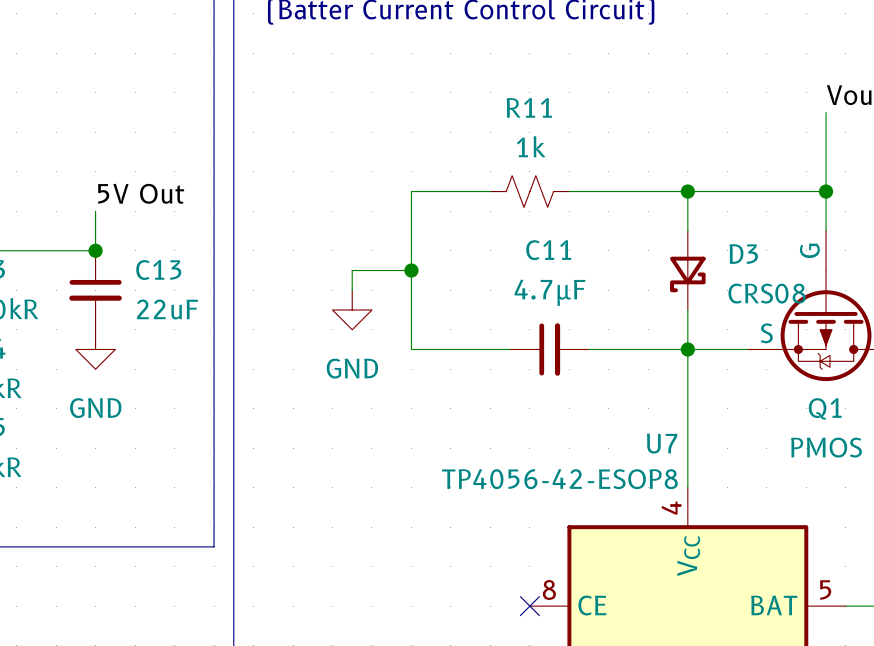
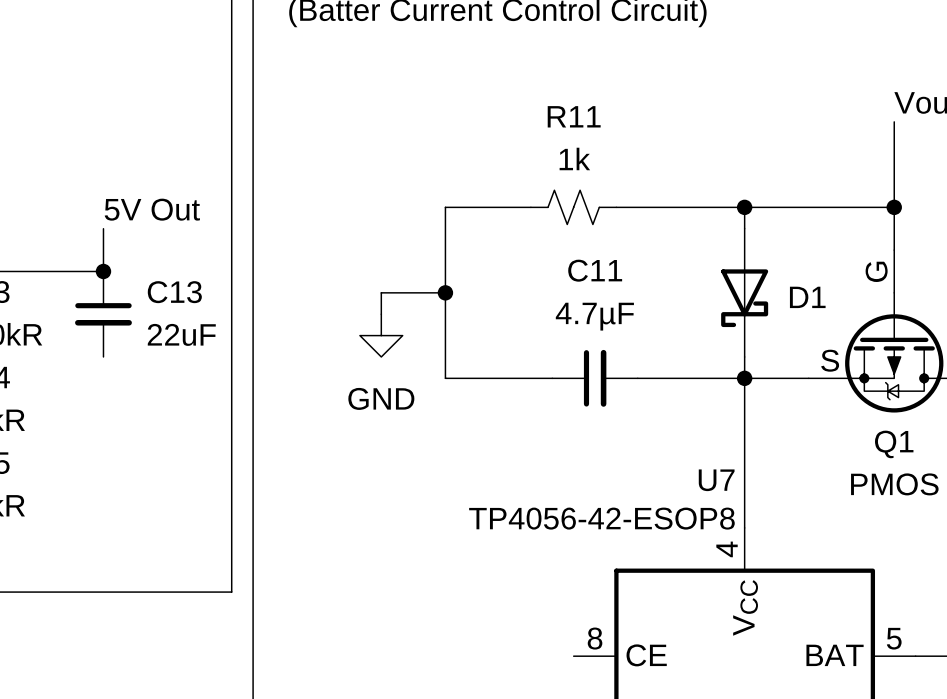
D3: CRS08 (687, 270) -> none
D1: none -> (744, 292)
power symbol: GND (95, 349) -> none
no-connect mark: (529, 606) -> none

